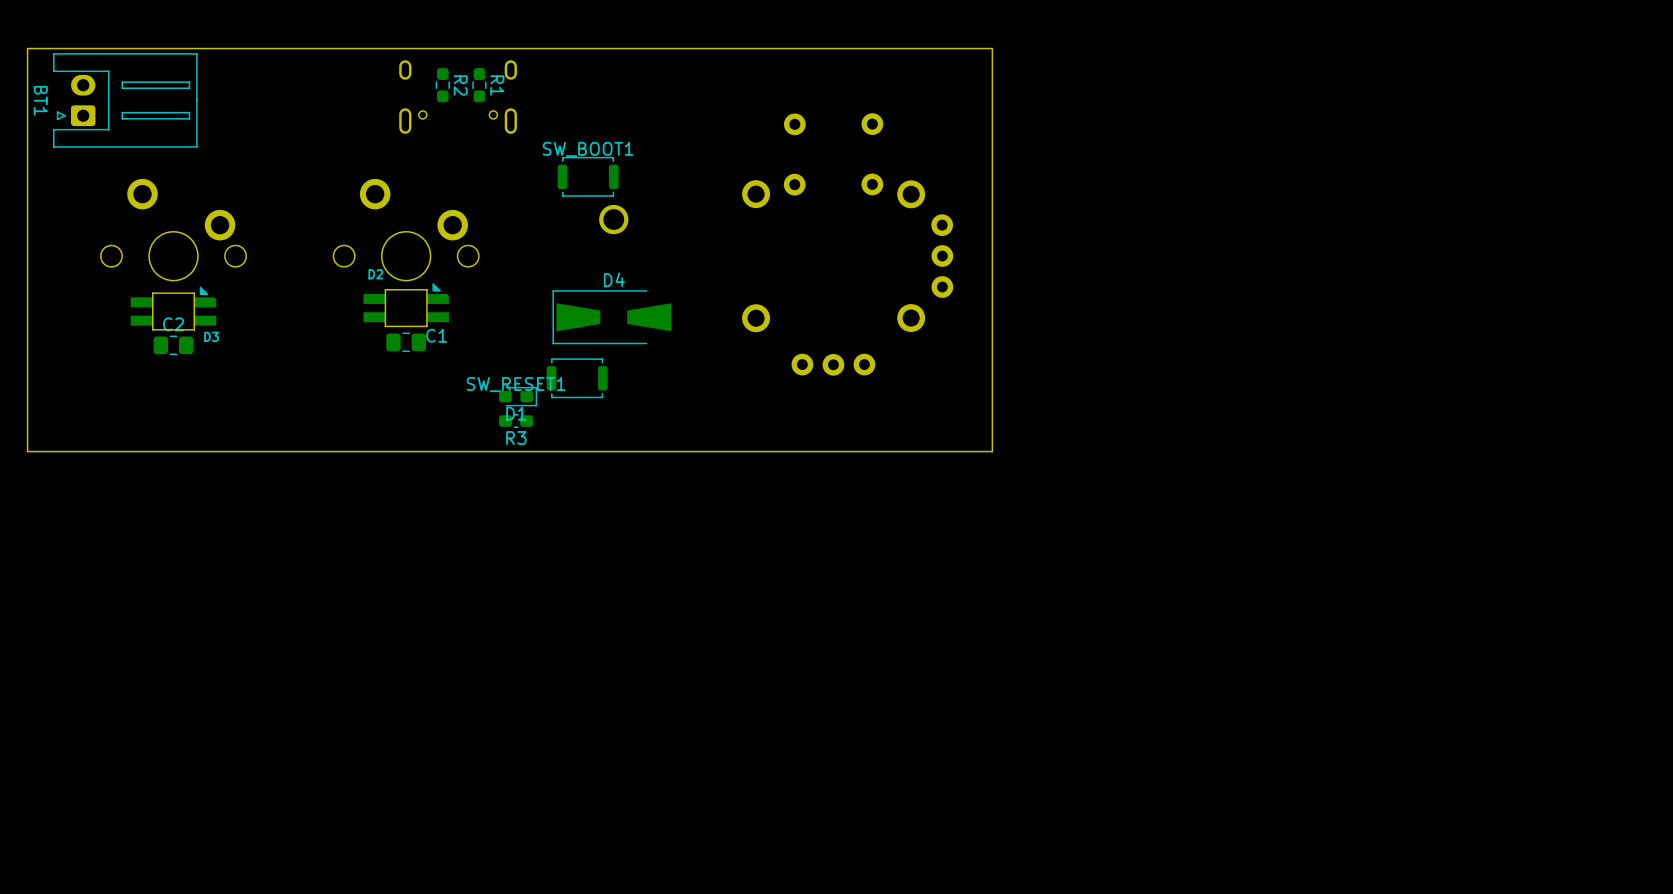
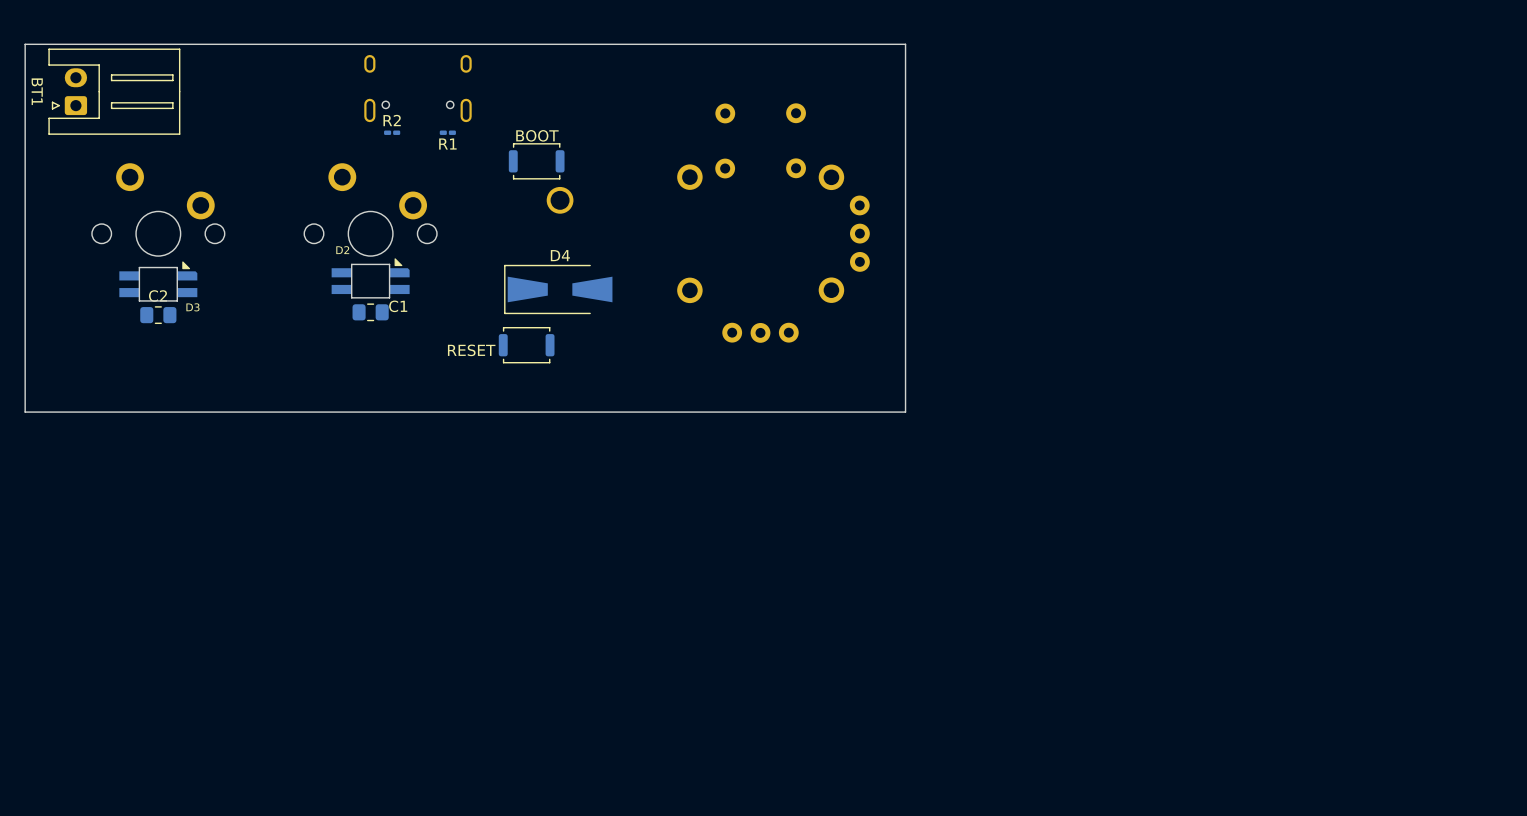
R2 footprint: [435, 68, 450, 103] -> [384, 130, 401, 135]
R1 footprint: [472, 68, 487, 103] -> [439, 130, 456, 135]
SW_BOOT1 name: SW_BOOT1 (588, 149) -> BOOT (537, 135)
SW_RESET1 name: SW_RESET1 (516, 384) -> RESET (471, 350)
D1: (518, 396) -> none
R3: (516, 421) -> none

